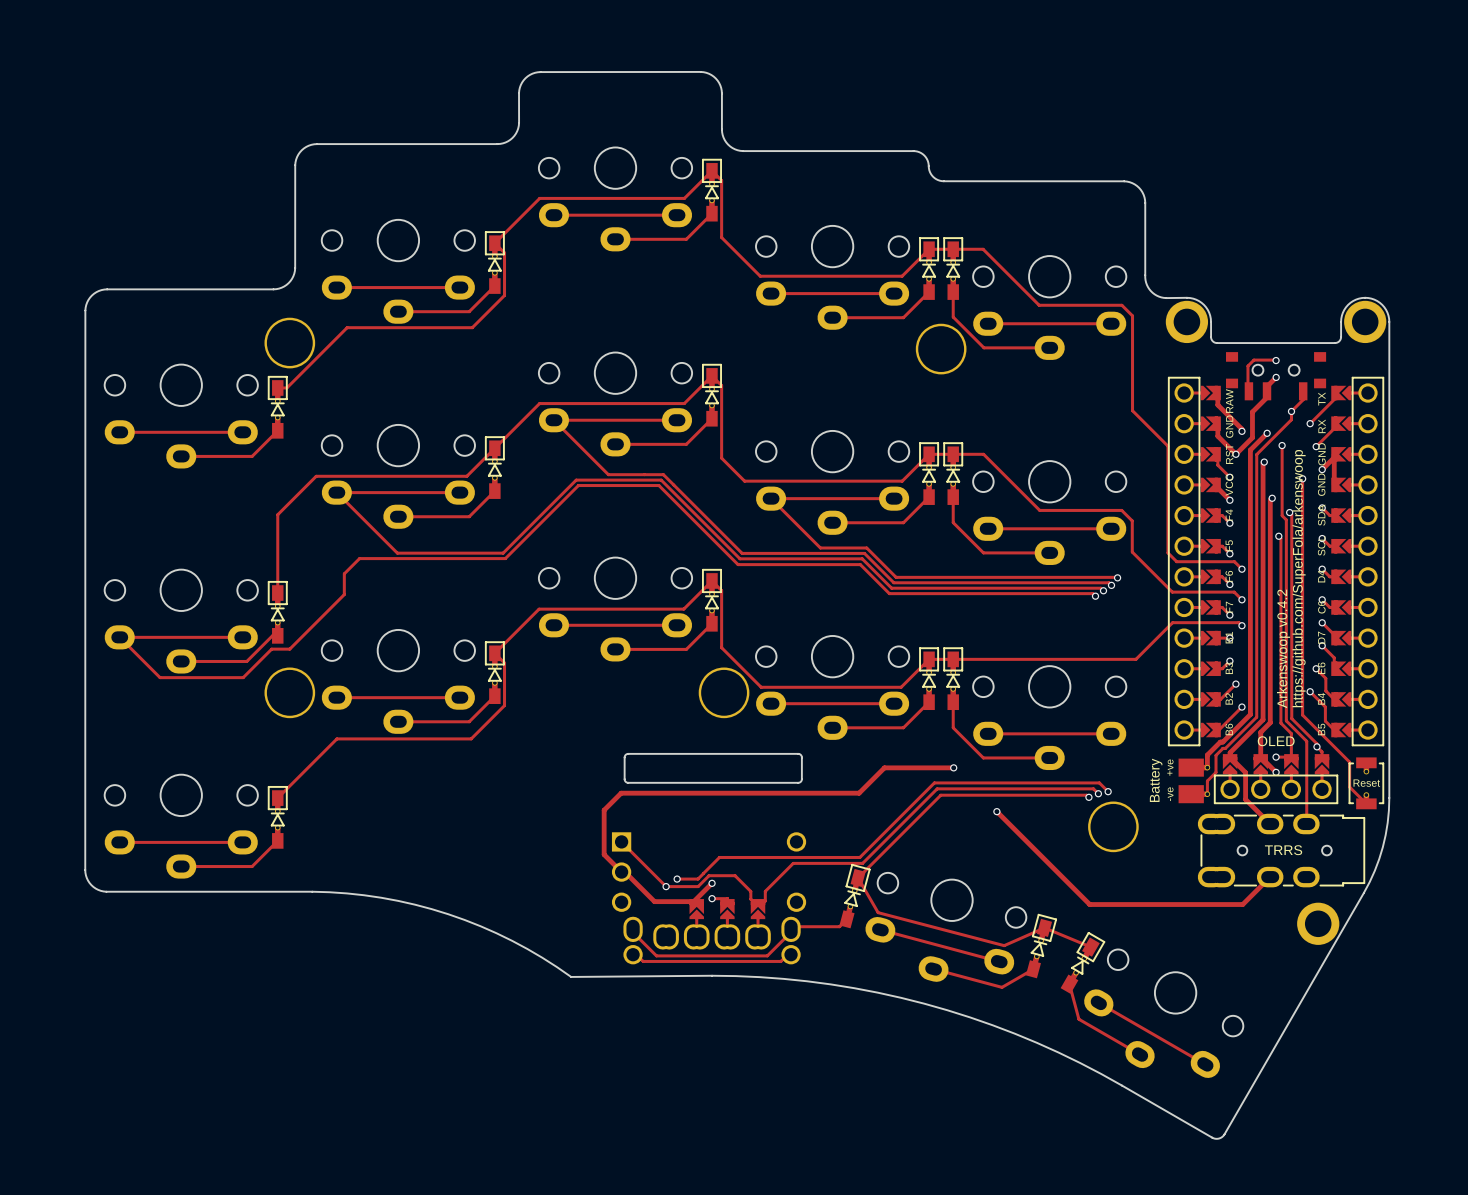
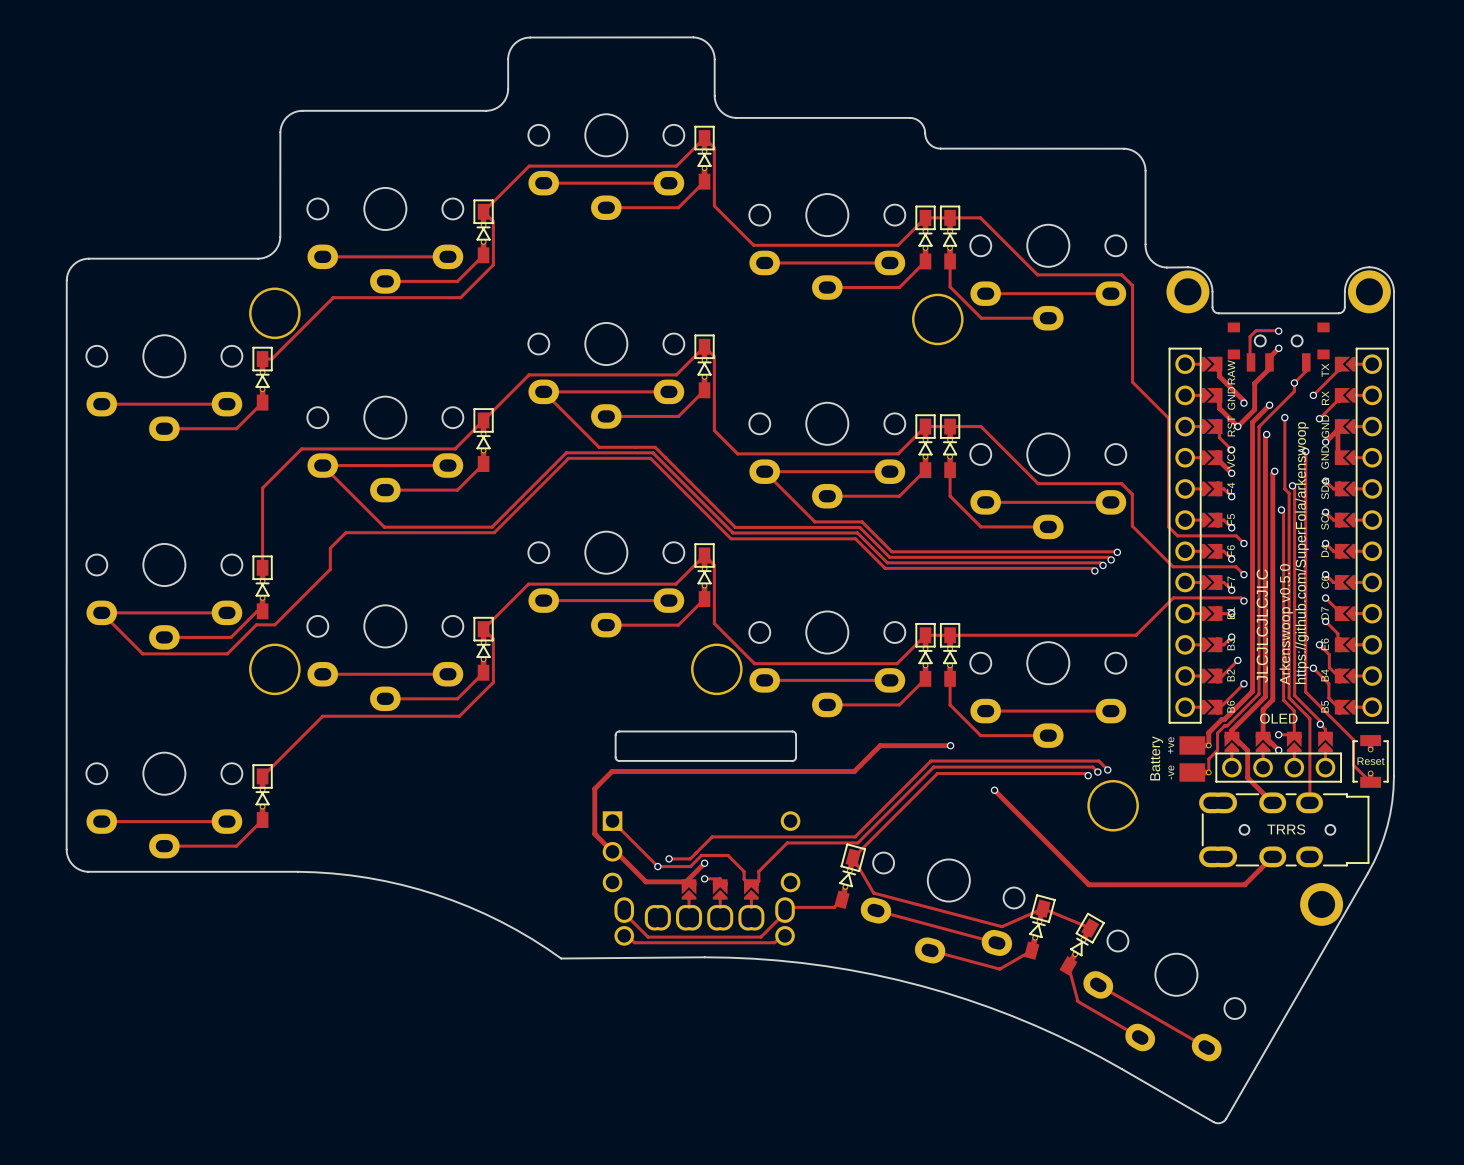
text: Arkenswoop v0.4.2 (1283, 648) -> Arkenswoop v0.5.0 (1286, 624)
text: none -> JLCJLCJLCJLC (1262, 626)

